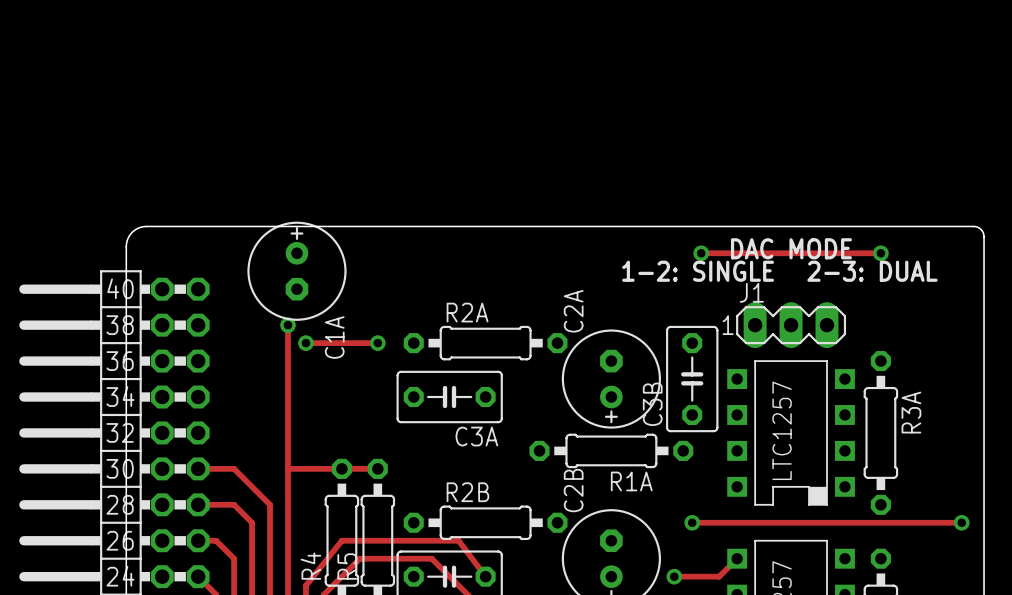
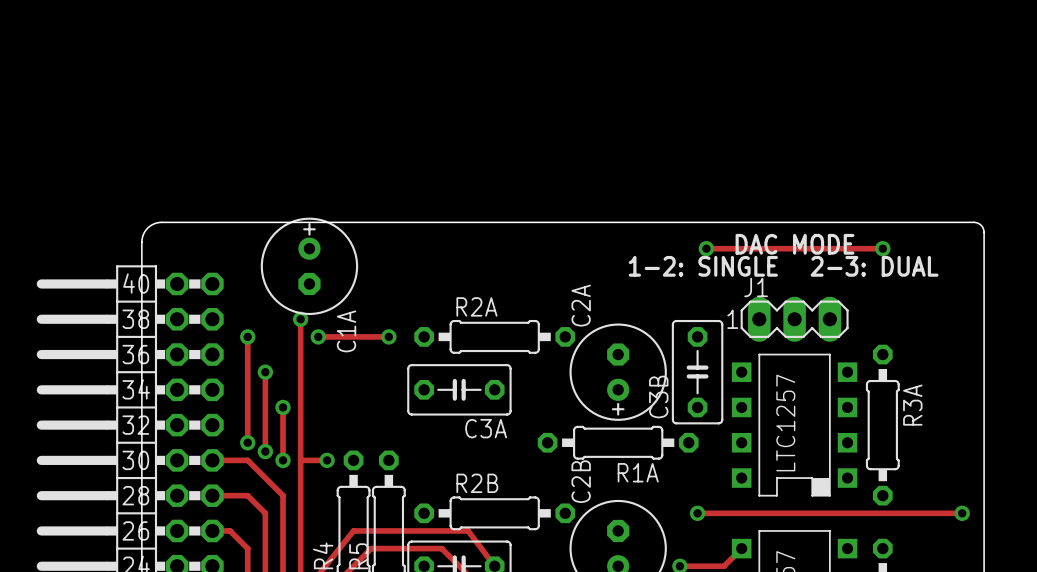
track: none -> (247, 336) (247, 442)
via: none -> (247, 336)
track: none -> (265, 372) (265, 451)
via: none -> (265, 372)
track: none -> (283, 407) (283, 460)
via: none -> (283, 407)
via: none -> (247, 442)
via: none -> (265, 451)
via: none -> (283, 460)
track: (314, 468) (377, 468) -> none
via: none -> (327, 460)

